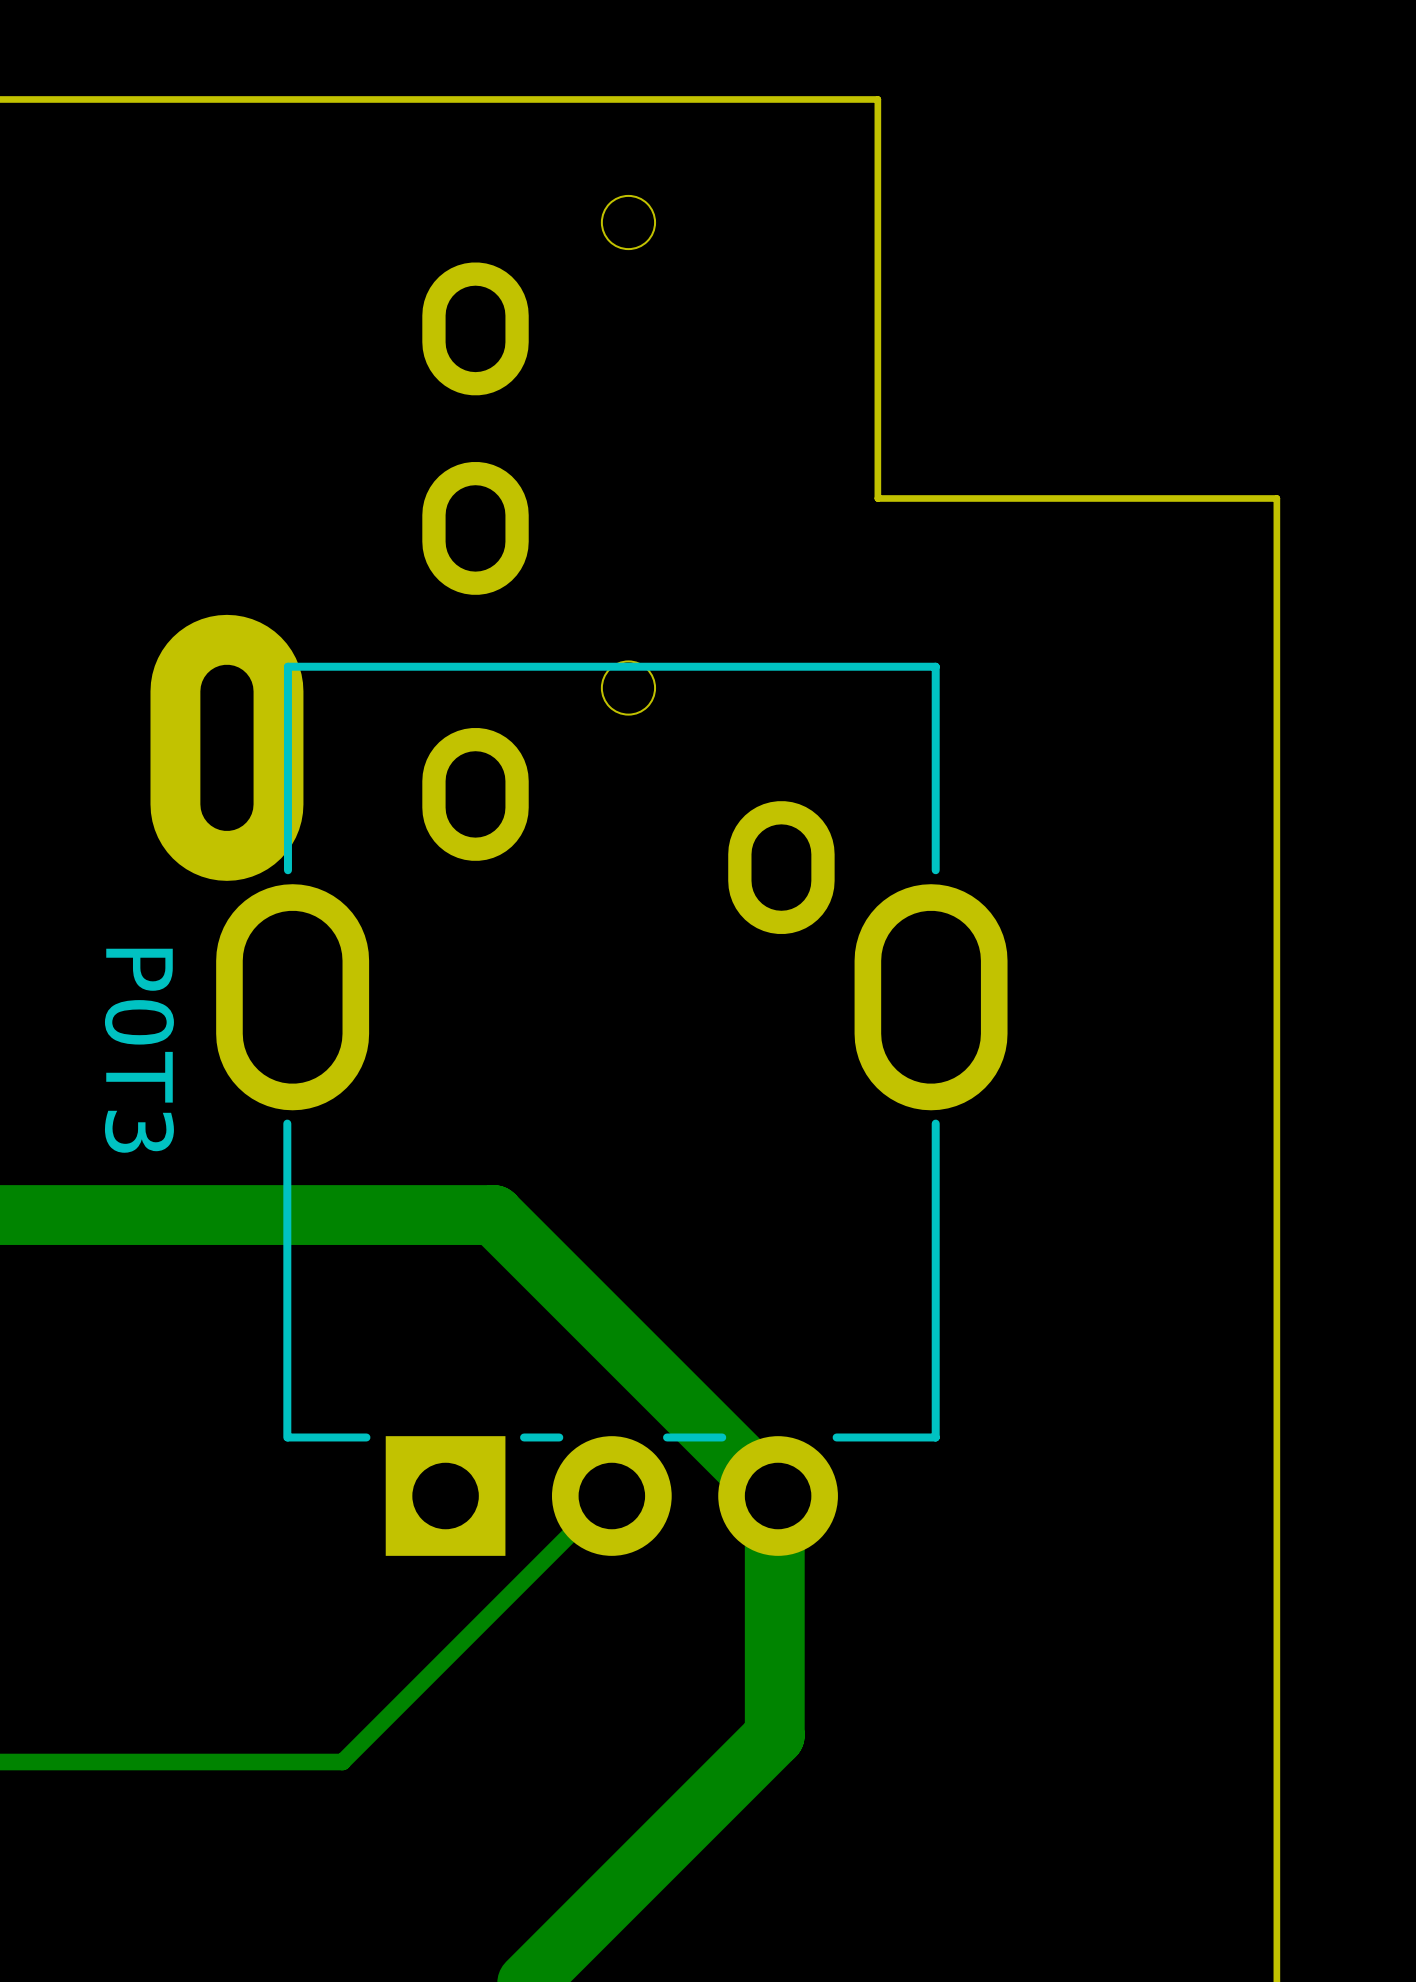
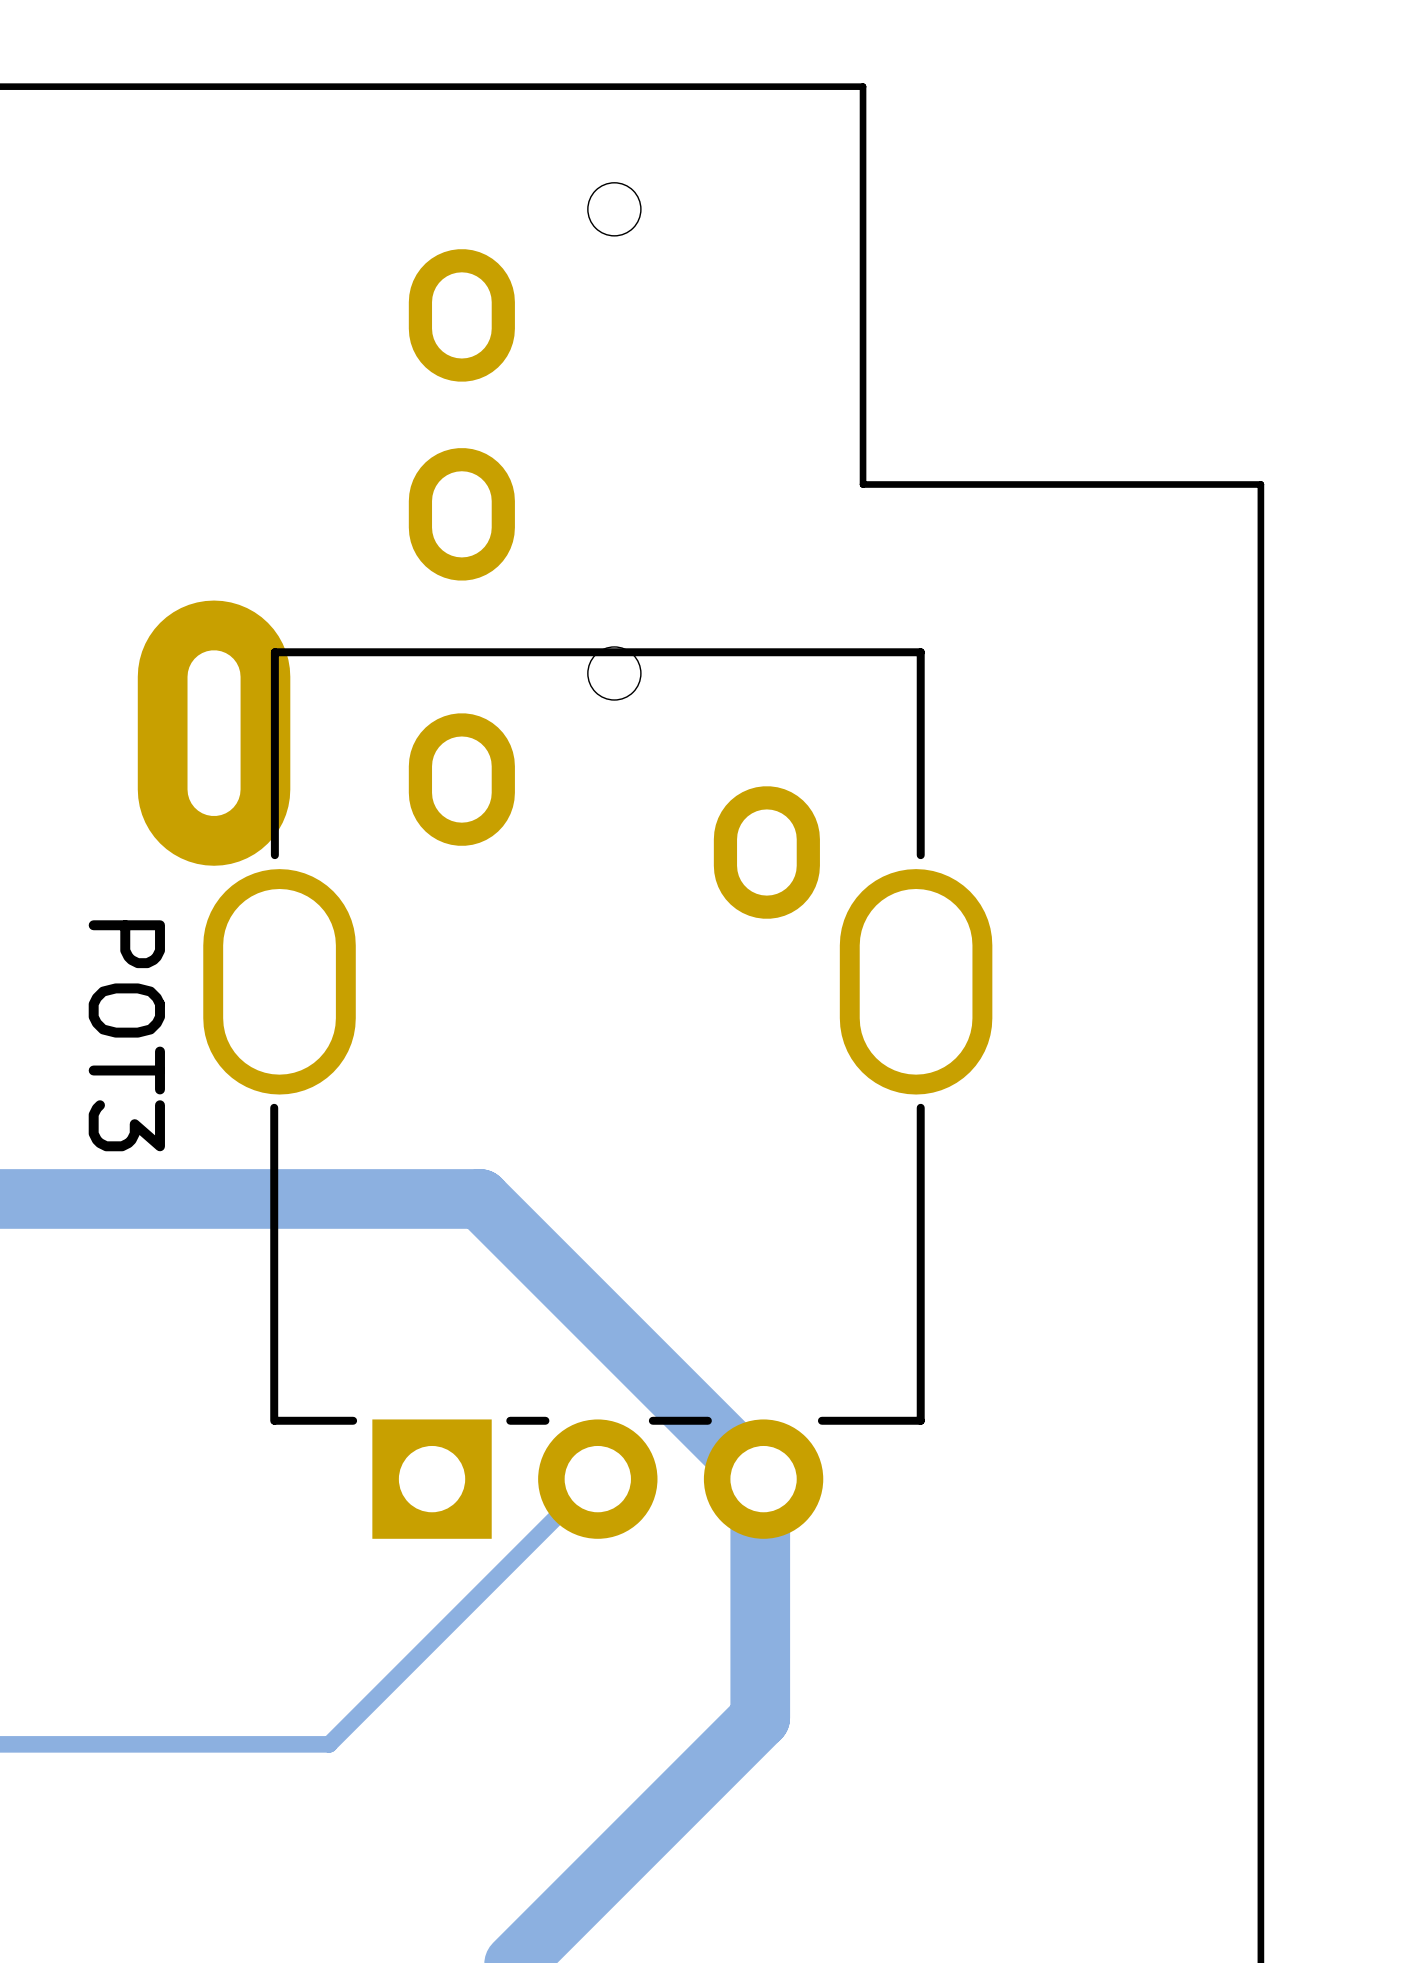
POT3 footprint: [216, 662, 1008, 1556] -> [203, 648, 993, 1539]

